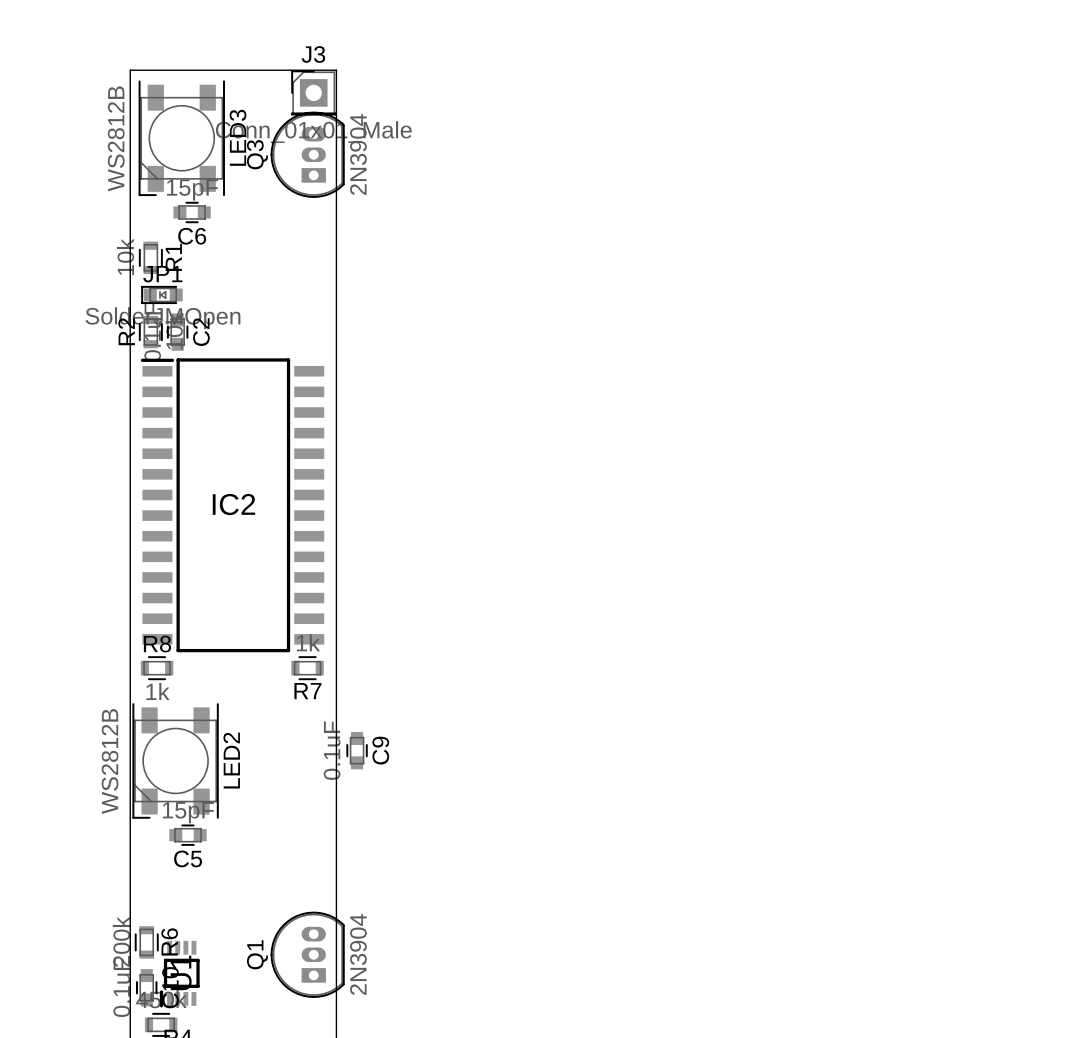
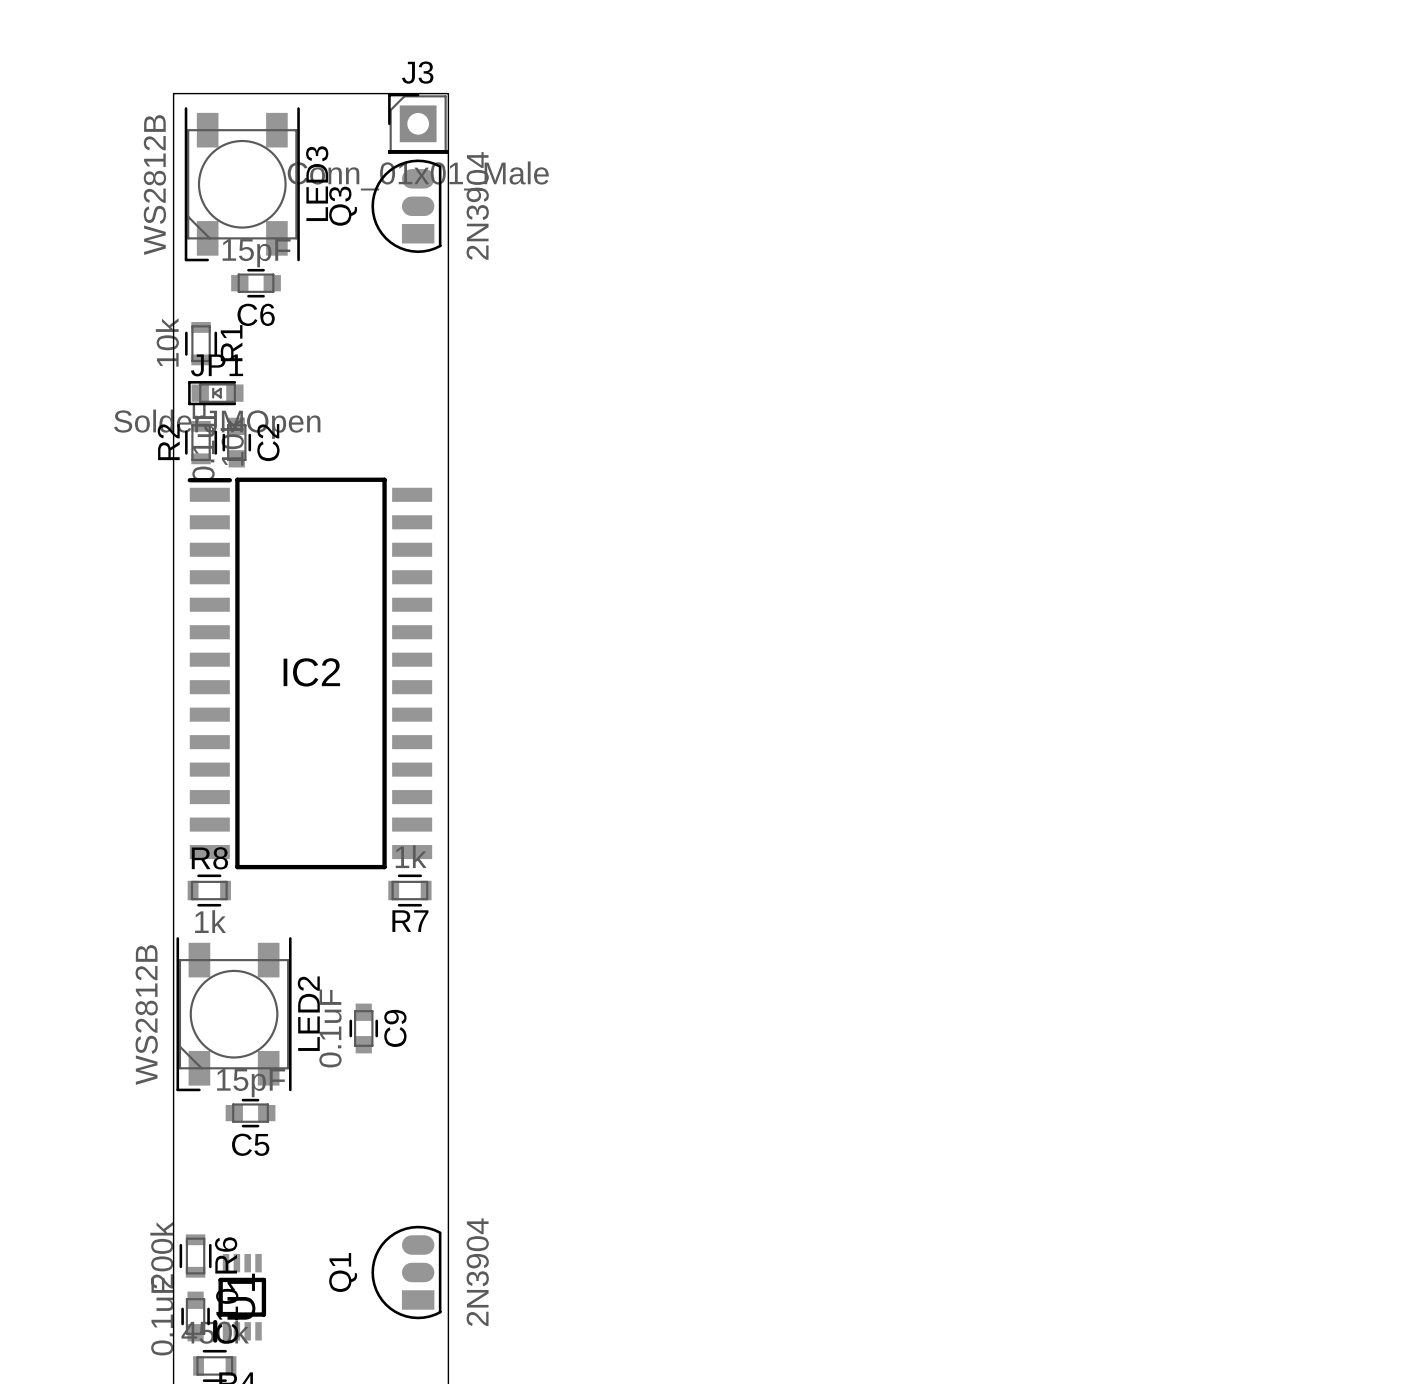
Q3 footprint: [270, 111, 345, 198] -> [371, 159, 442, 254]
C9 position: (357, 750) -> (363, 1028)
Q1 footprint: [270, 911, 345, 998] -> [371, 1225, 442, 1320]

